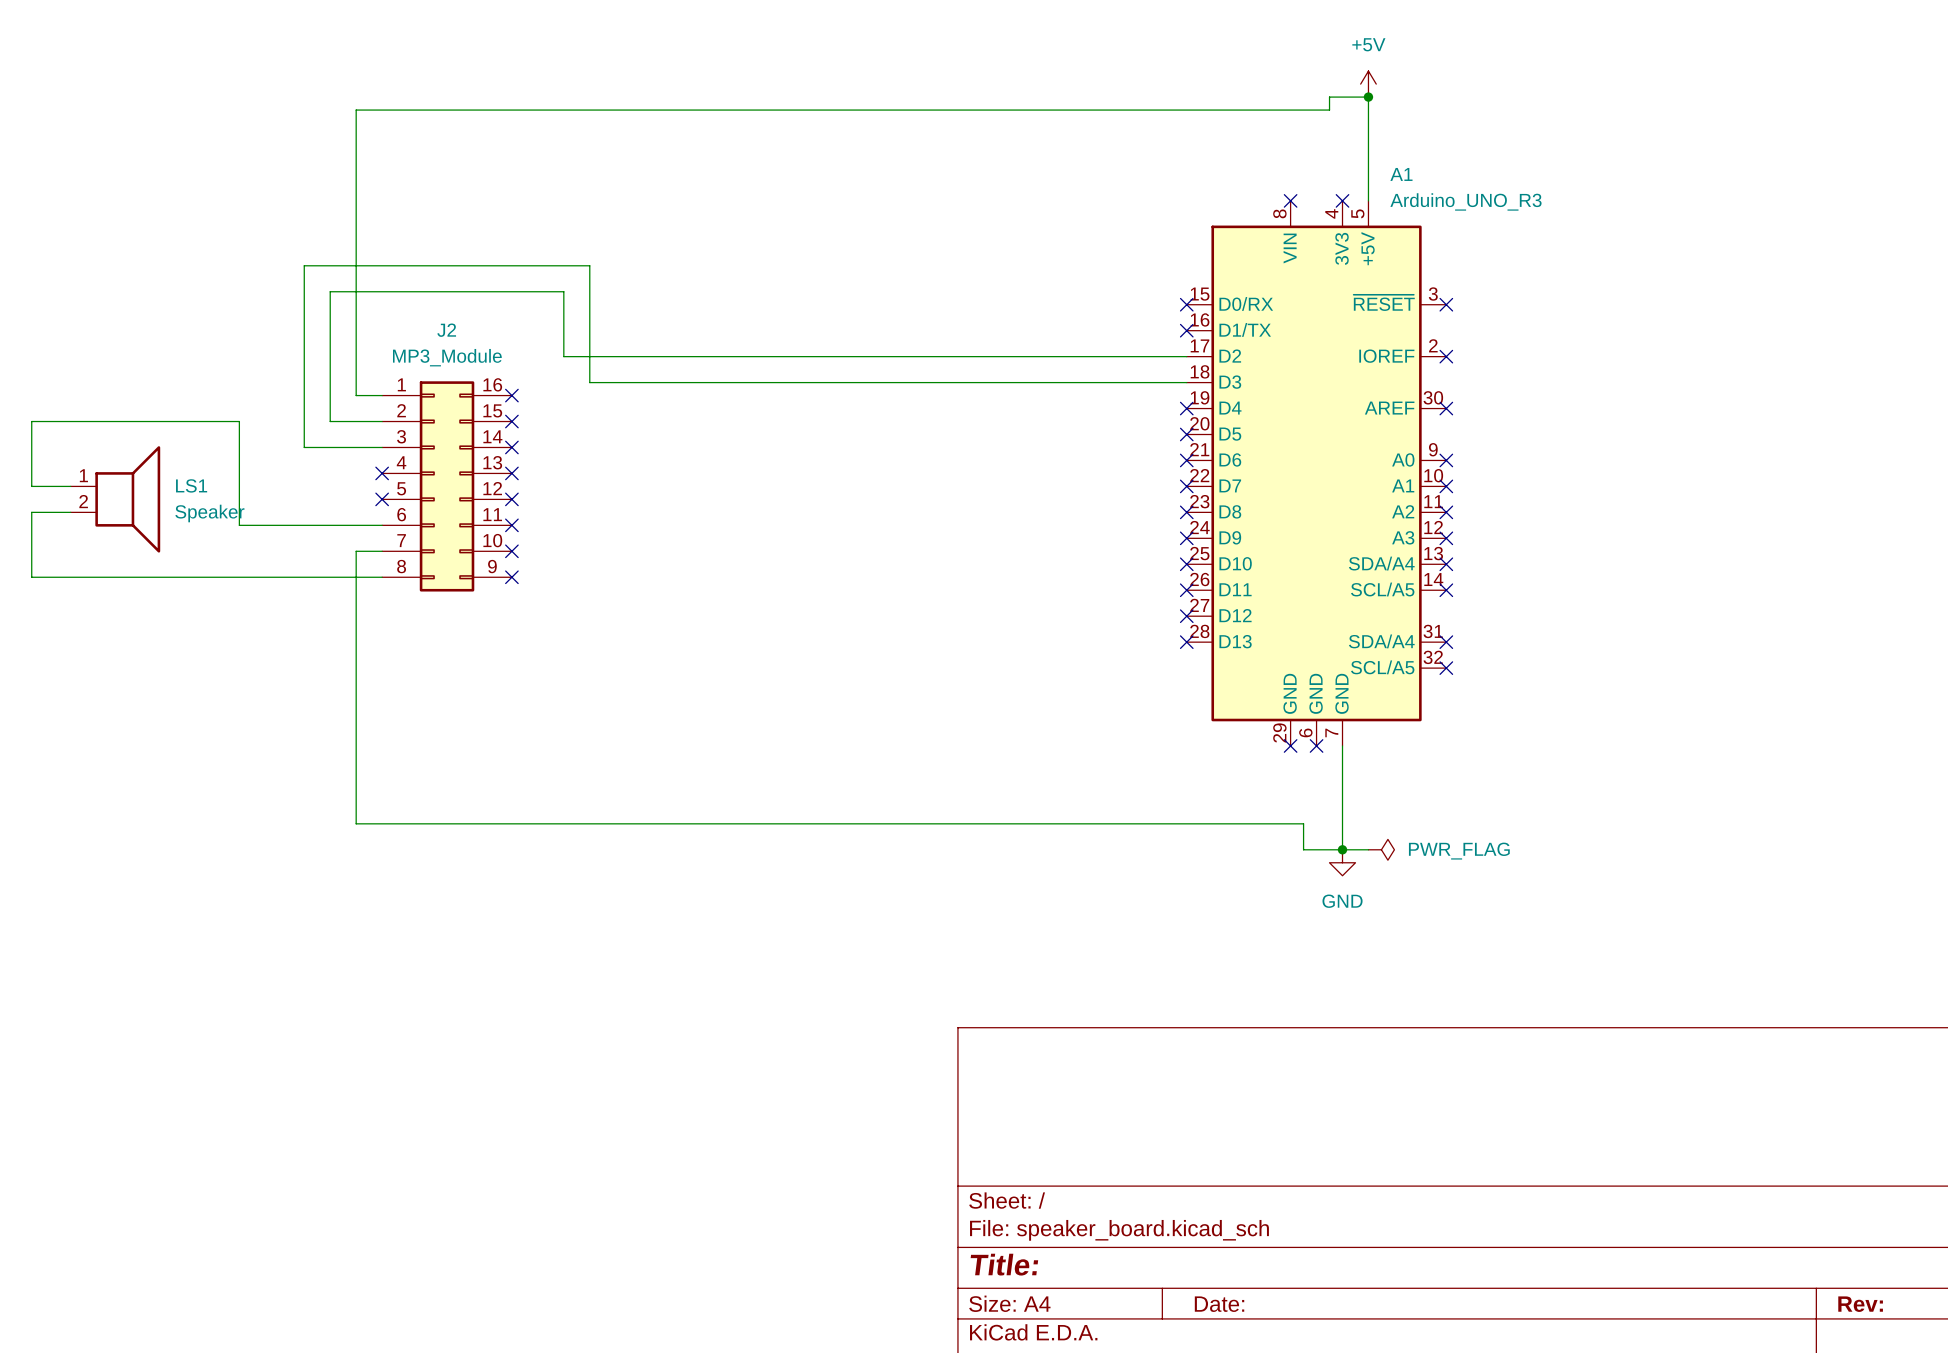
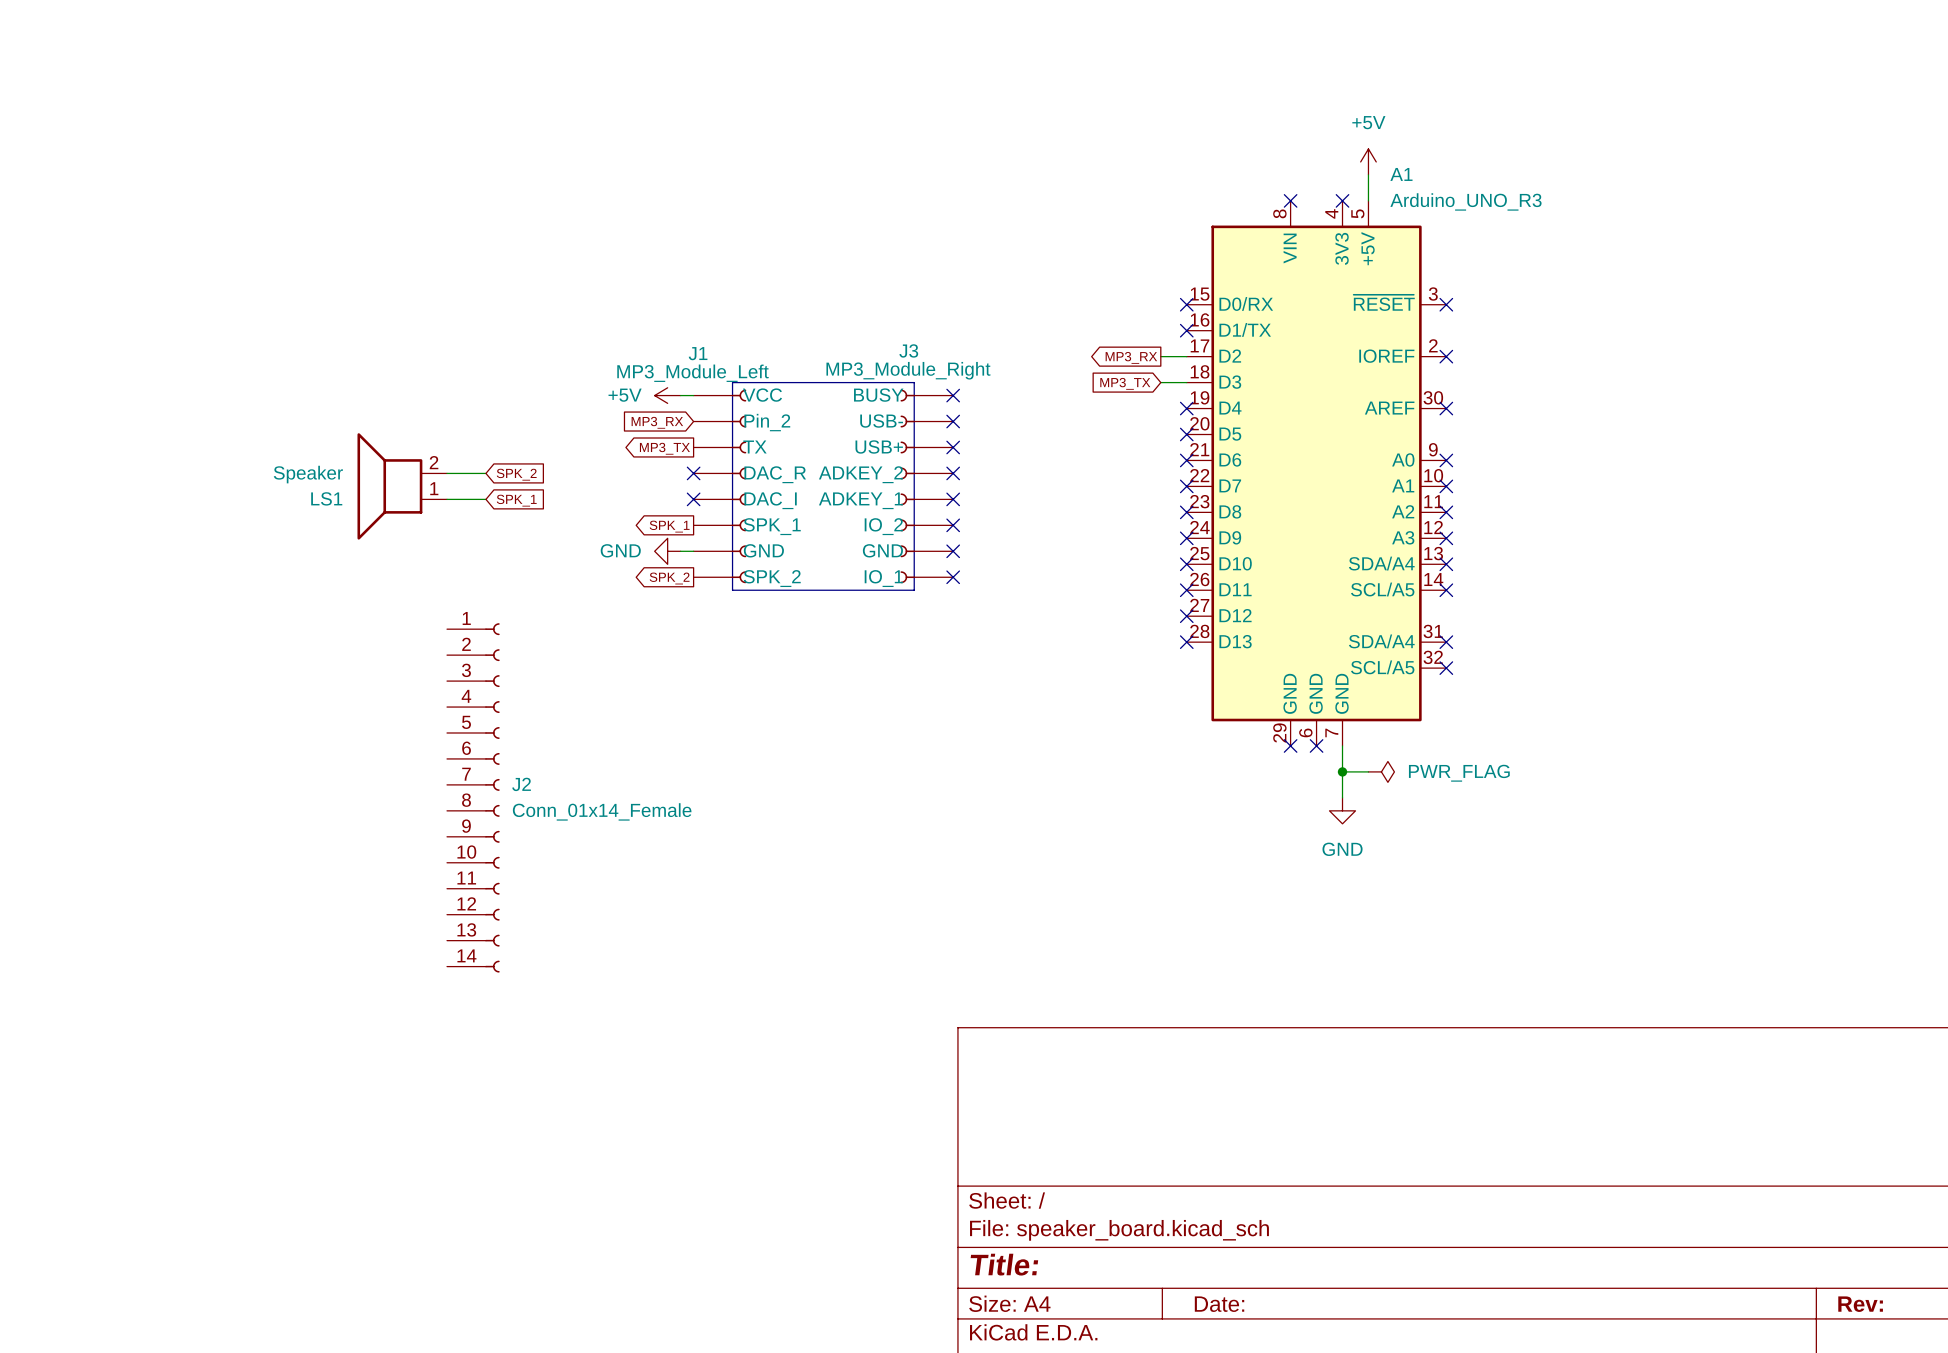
power symbol position: +5V (1368, 84) -> +5V (1368, 161)
junction: (1368, 97) -> none
wire: (1368, 174) (1368, 97) (1329, 97) (1329, 110) (356, 110) (356, 395) (382, 395) -> none
J2 name position: J2 (446, 330) -> J2 (521, 784)
wire: (1160, 356) (563, 356) (563, 291) (330, 291) (330, 421) (382, 421) -> none
J2 value: MP3_Module (447, 357) -> Conn_01x14_Female (602, 811)
global label: none -> MP3_RX (1131, 357)
J2 symbol: [382, 381, 512, 592] -> [447, 623, 500, 973]
line: none -> (732, 382) (914, 382) (914, 590) (732, 590) (732, 382)
wire: (1160, 382) (589, 382) (589, 265) (304, 265) (304, 447) (382, 447) -> none
global label: none -> MP3_TX (1125, 383)
no-connect mark: (511, 395) -> none
power symbol: none -> +5V (667, 395)
wire: none -> (680, 395) (693, 395)
no-connect mark: none -> (953, 395)
no-connect mark: (511, 421) -> none
no-connect mark: none -> (953, 421)
global label: none -> MP3_RX (657, 422)
no-connect mark: (511, 447) -> none
no-connect mark: none -> (953, 447)
global label: none -> MP3_TX (664, 448)
no-connect mark: (382, 473) -> none
no-connect mark: (511, 473) -> none
no-connect mark: none -> (693, 473)
no-connect mark: none -> (953, 473)
global label: none -> SPK_2 (516, 474)
wire: (70, 486) (31, 486) (31, 421) (239, 421) (239, 525) (382, 525) -> none
J1: none -> MP3_Module_Left (719, 486)
J3: none -> MP3_Module_Right (926, 486)
LS1 position: (115, 499) -> (402, 486)
LS1 rotation: 0° (127, 499) -> 180° (389, 486)
no-connect mark: (382, 499) -> none
no-connect mark: (511, 499) -> none
no-connect mark: none -> (693, 499)
no-connect mark: none -> (953, 499)
global label: none -> SPK_1 (516, 500)
wire: (70, 512) (31, 512) (31, 577) (382, 577) -> none
no-connect mark: (511, 525) -> none
no-connect mark: none -> (953, 525)
global label: none -> SPK_1 (669, 526)
wire: (382, 551) (356, 551) (356, 823) (1303, 823) (1303, 849) (1368, 849) -> none
no-connect mark: (511, 551) -> none
power symbol: none -> GND (667, 551)
wire: none -> (680, 551) (693, 551)
no-connect mark: none -> (953, 551)
no-connect mark: (511, 577) -> none
no-connect mark: none -> (953, 577)
global label: none -> SPK_2 (669, 578)
wire: none -> (1342, 771) (1368, 771)
junction: none -> (1342, 771)
wire: (1342, 797) (1342, 849) -> none
junction: (1342, 849) -> none
power symbol position: PWR_FLAG (1381, 849) -> PWR_FLAG (1381, 771)
power symbol position: GND (1342, 862) -> GND (1342, 810)

